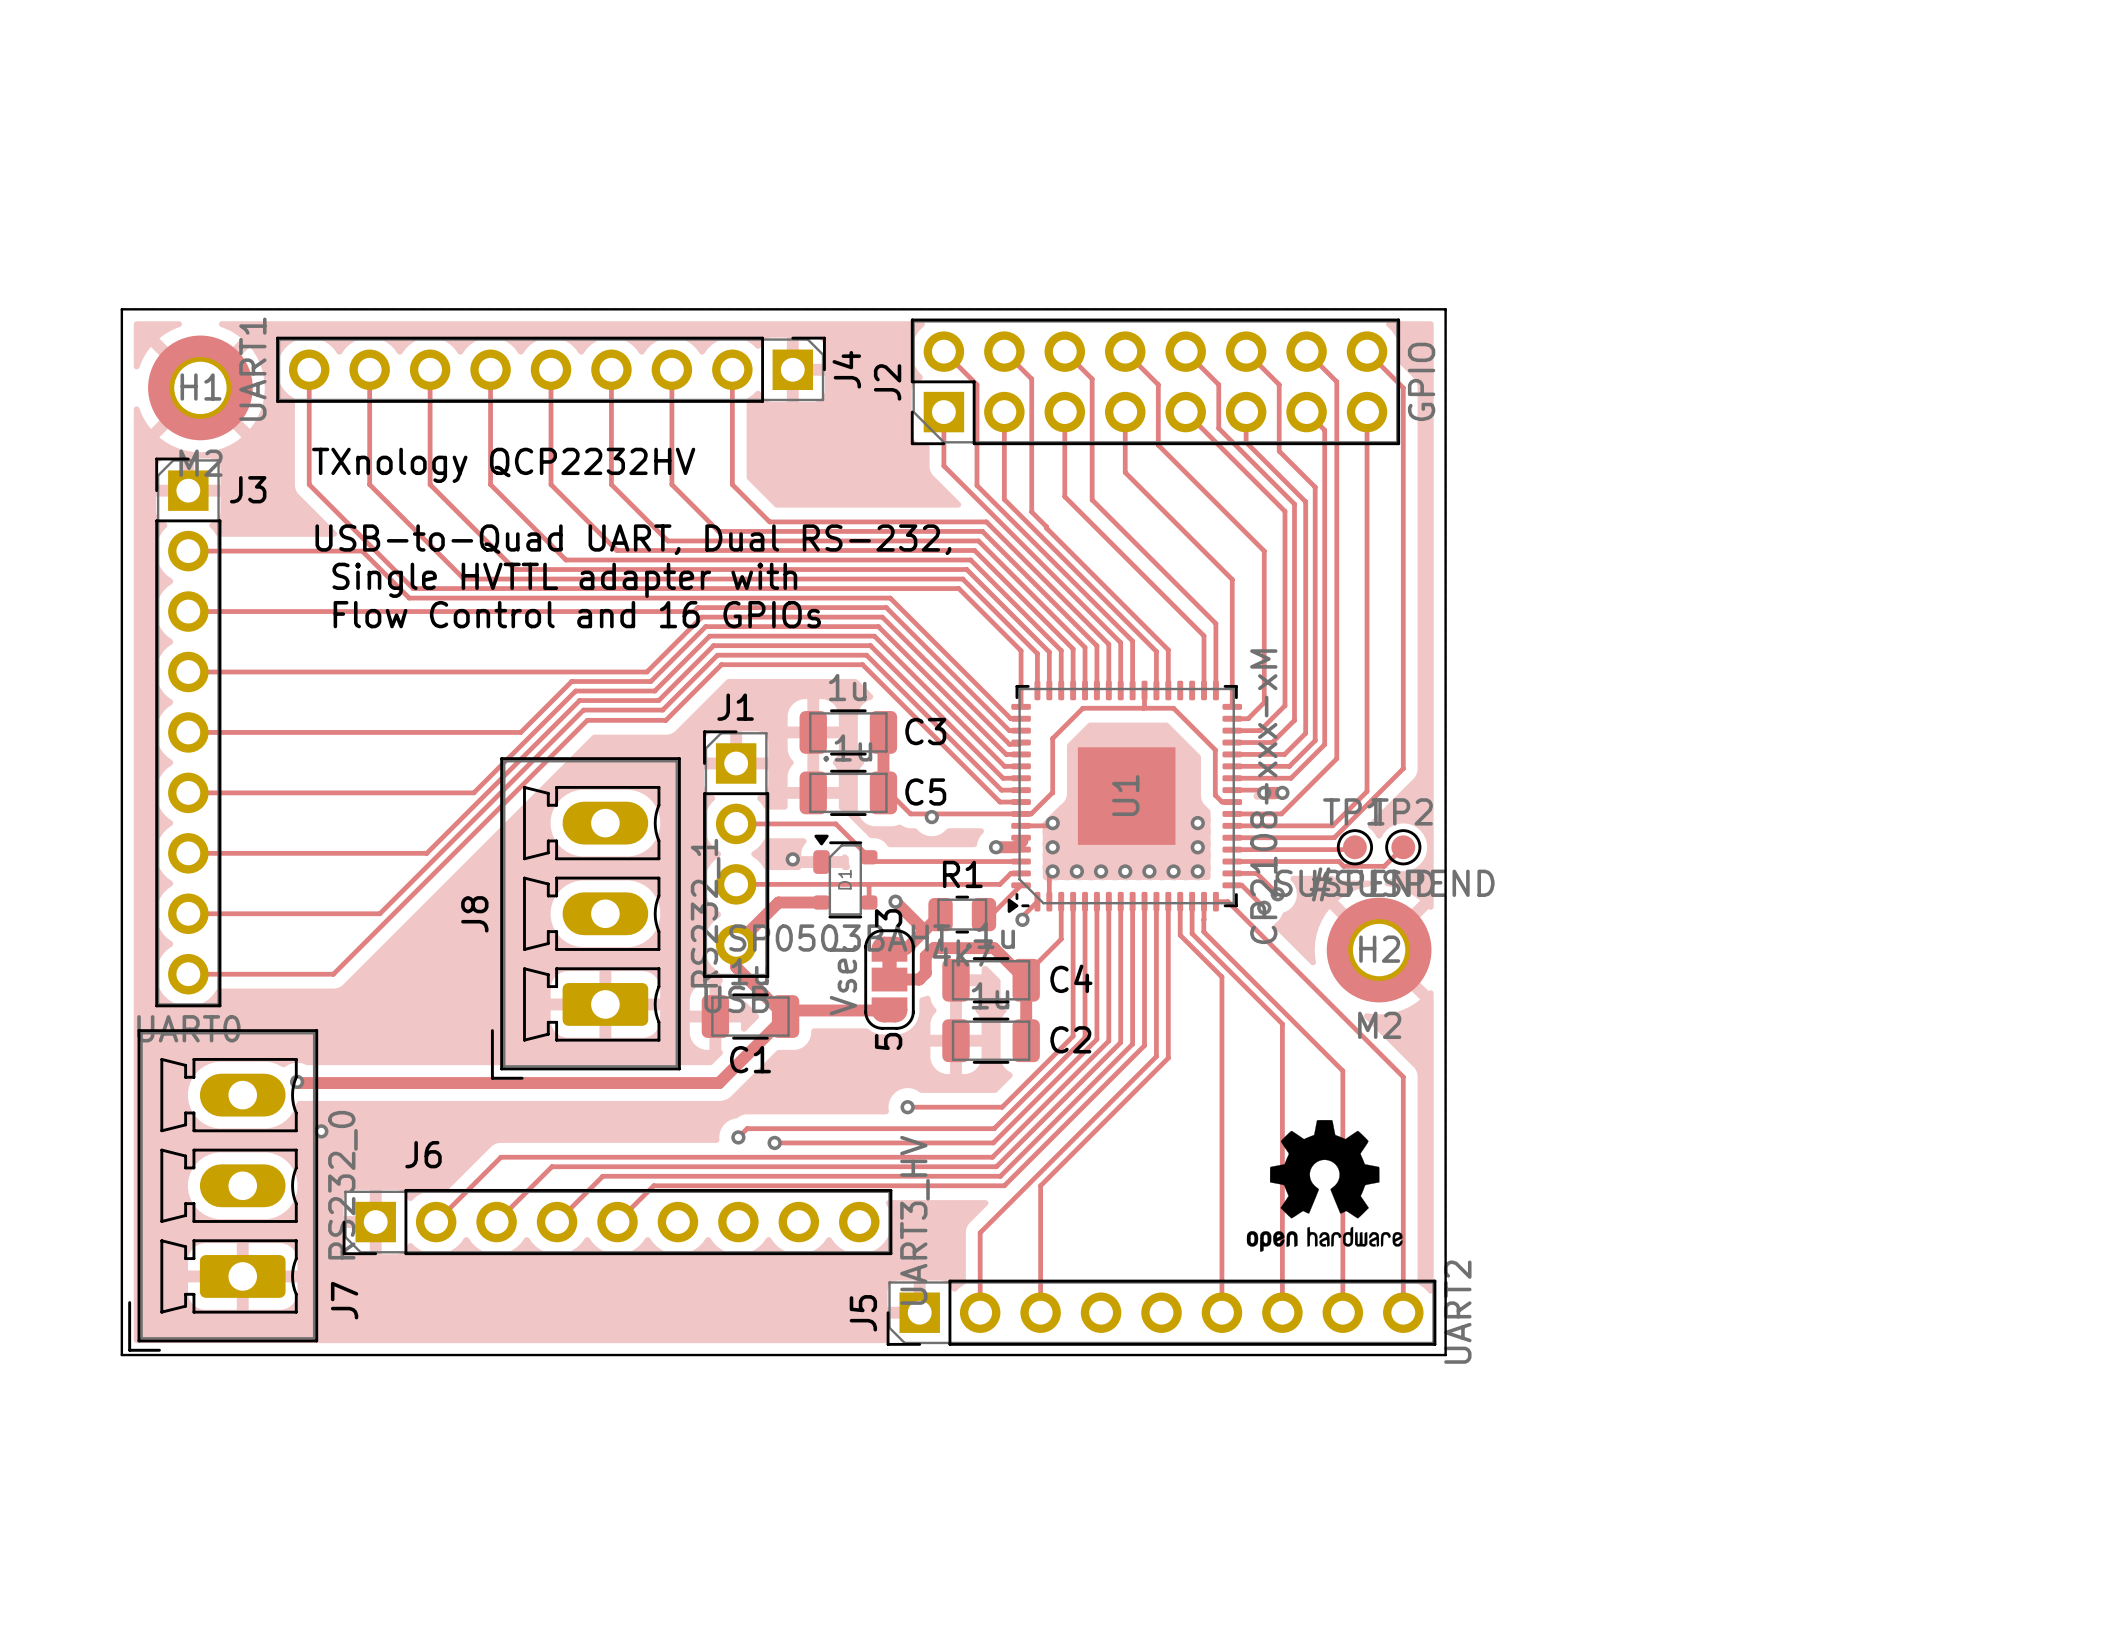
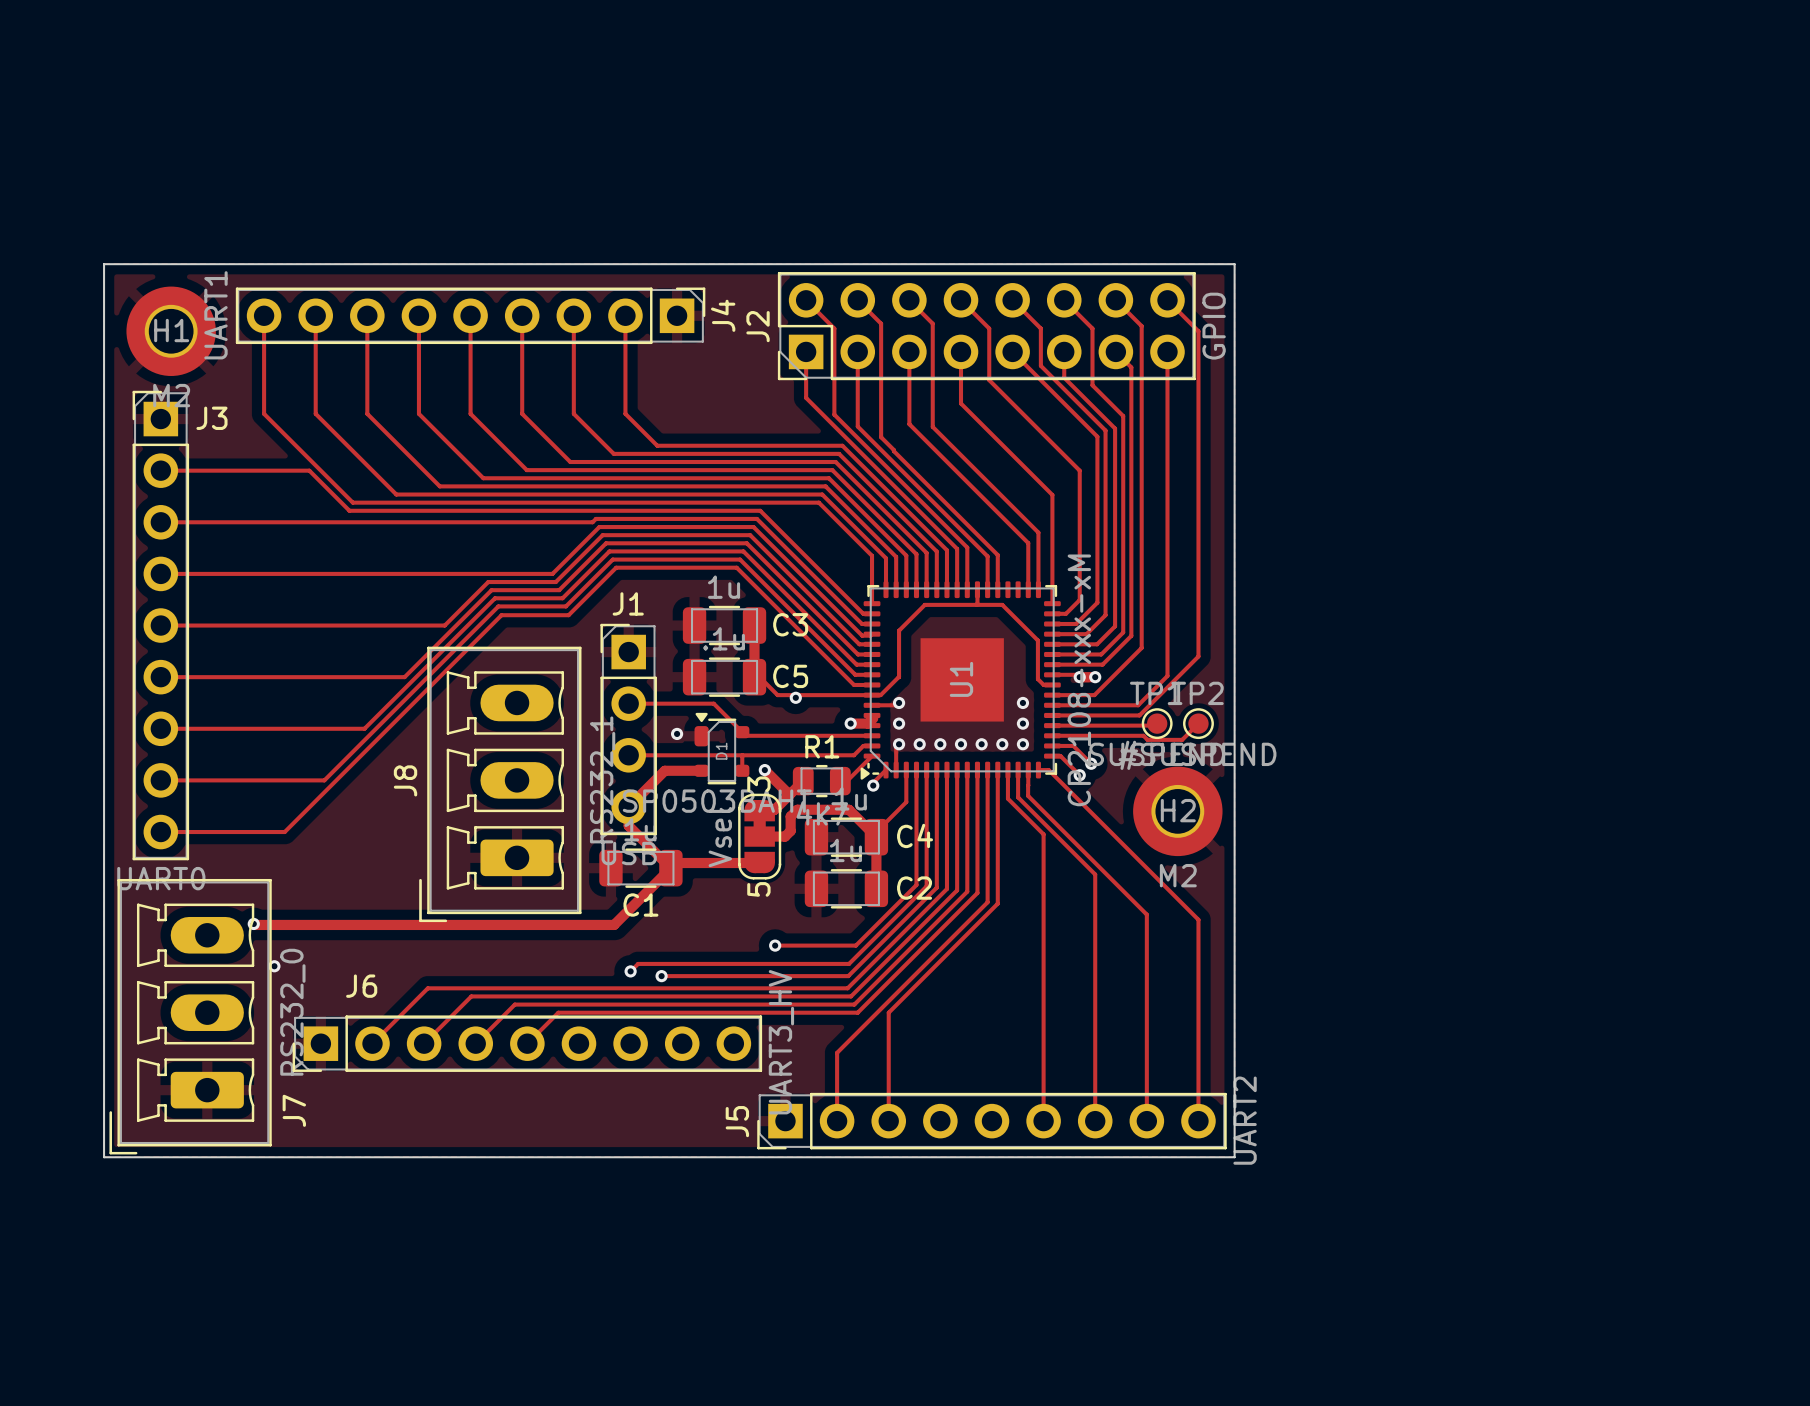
text: TXnology QCP2232HV (503, 465) -> none
text: USB-to-Quad UART, Dual RS-232, (633, 539) -> none
text: Single HVTTL adapter with (564, 580) -> none
text: Flow Control and 16 GPIOs (577, 614) -> none
drawing: [1246, 1120, 1403, 1252] -> none

